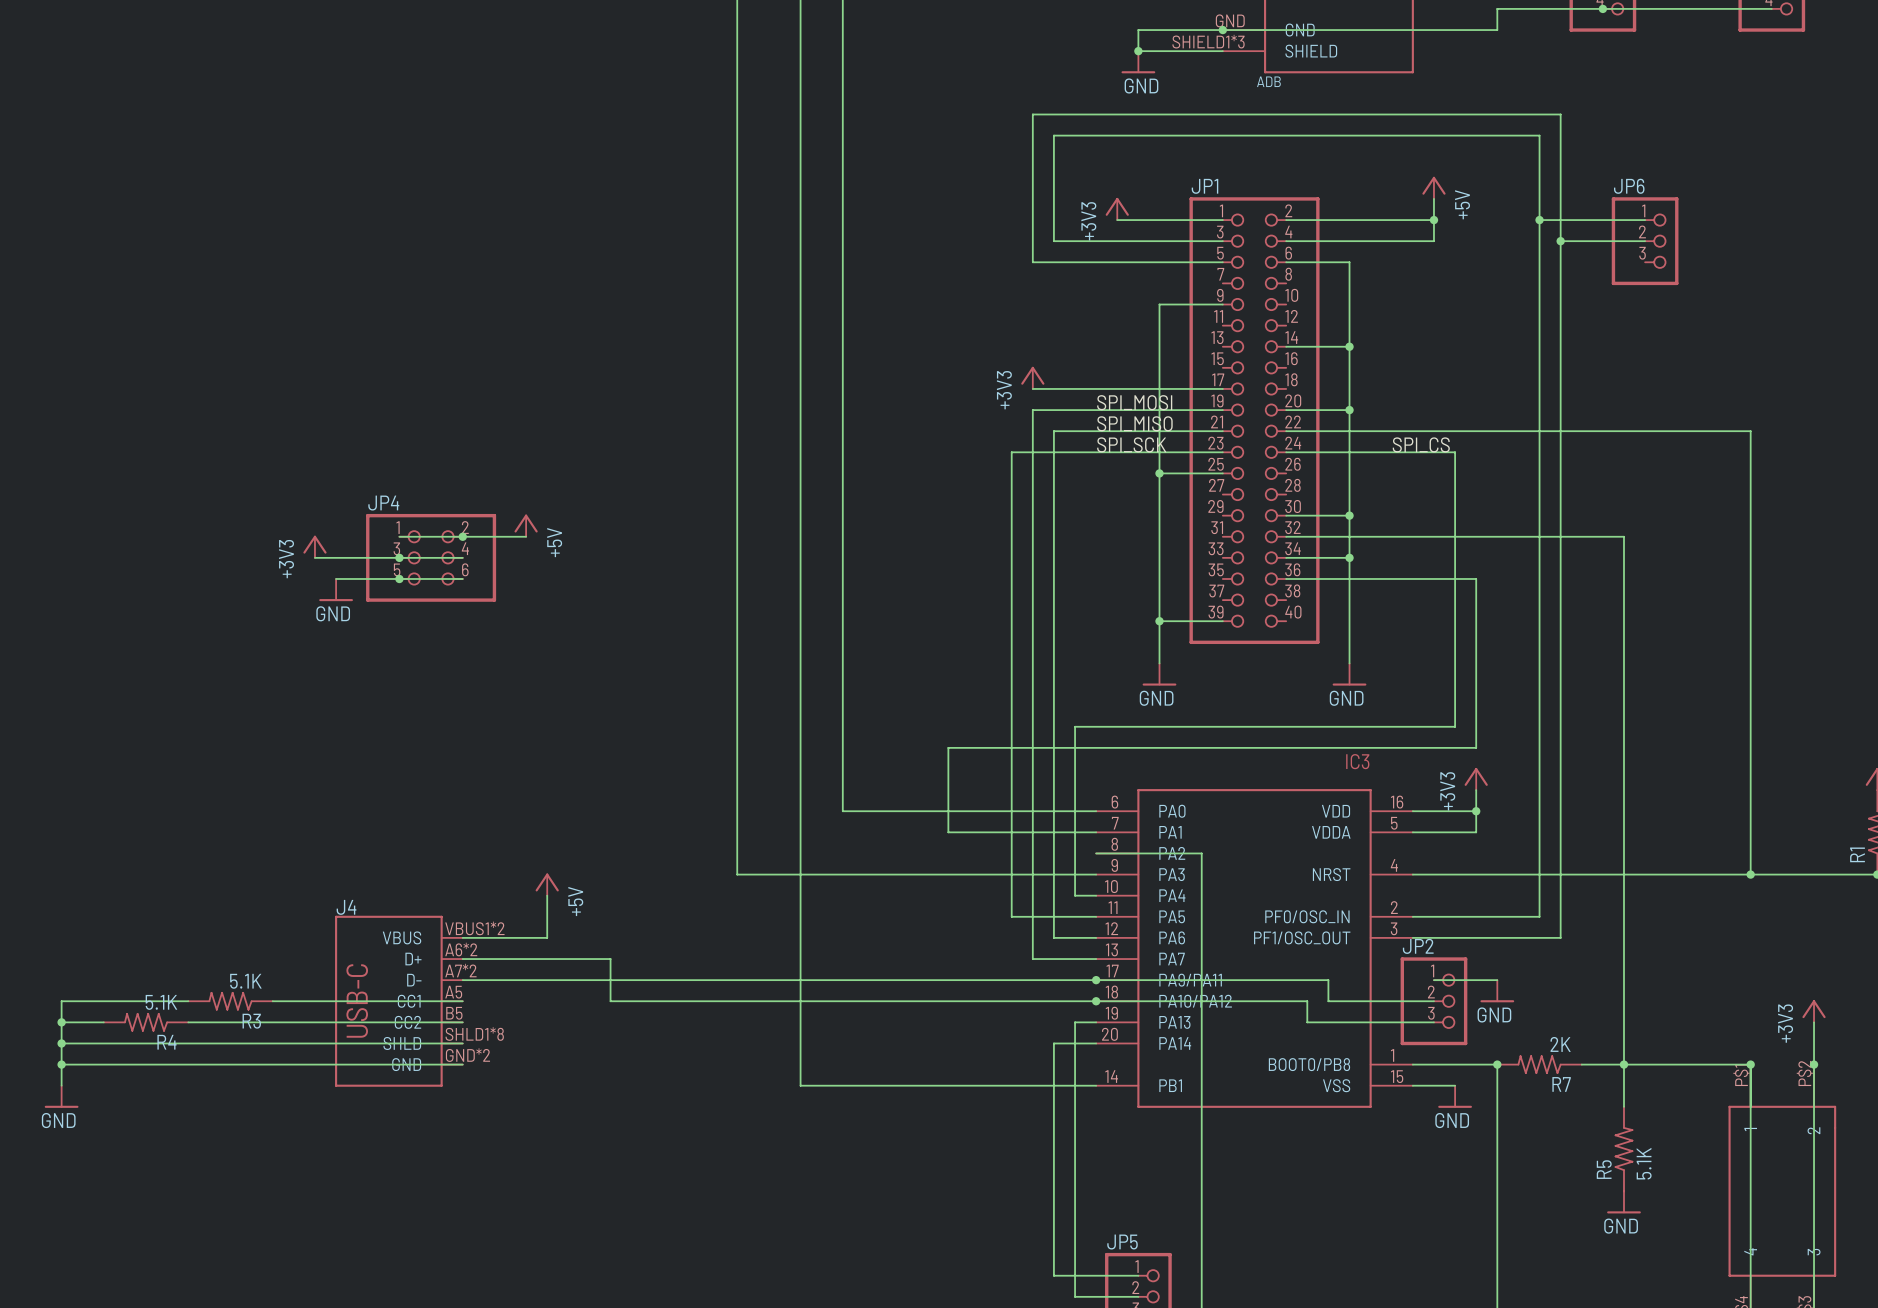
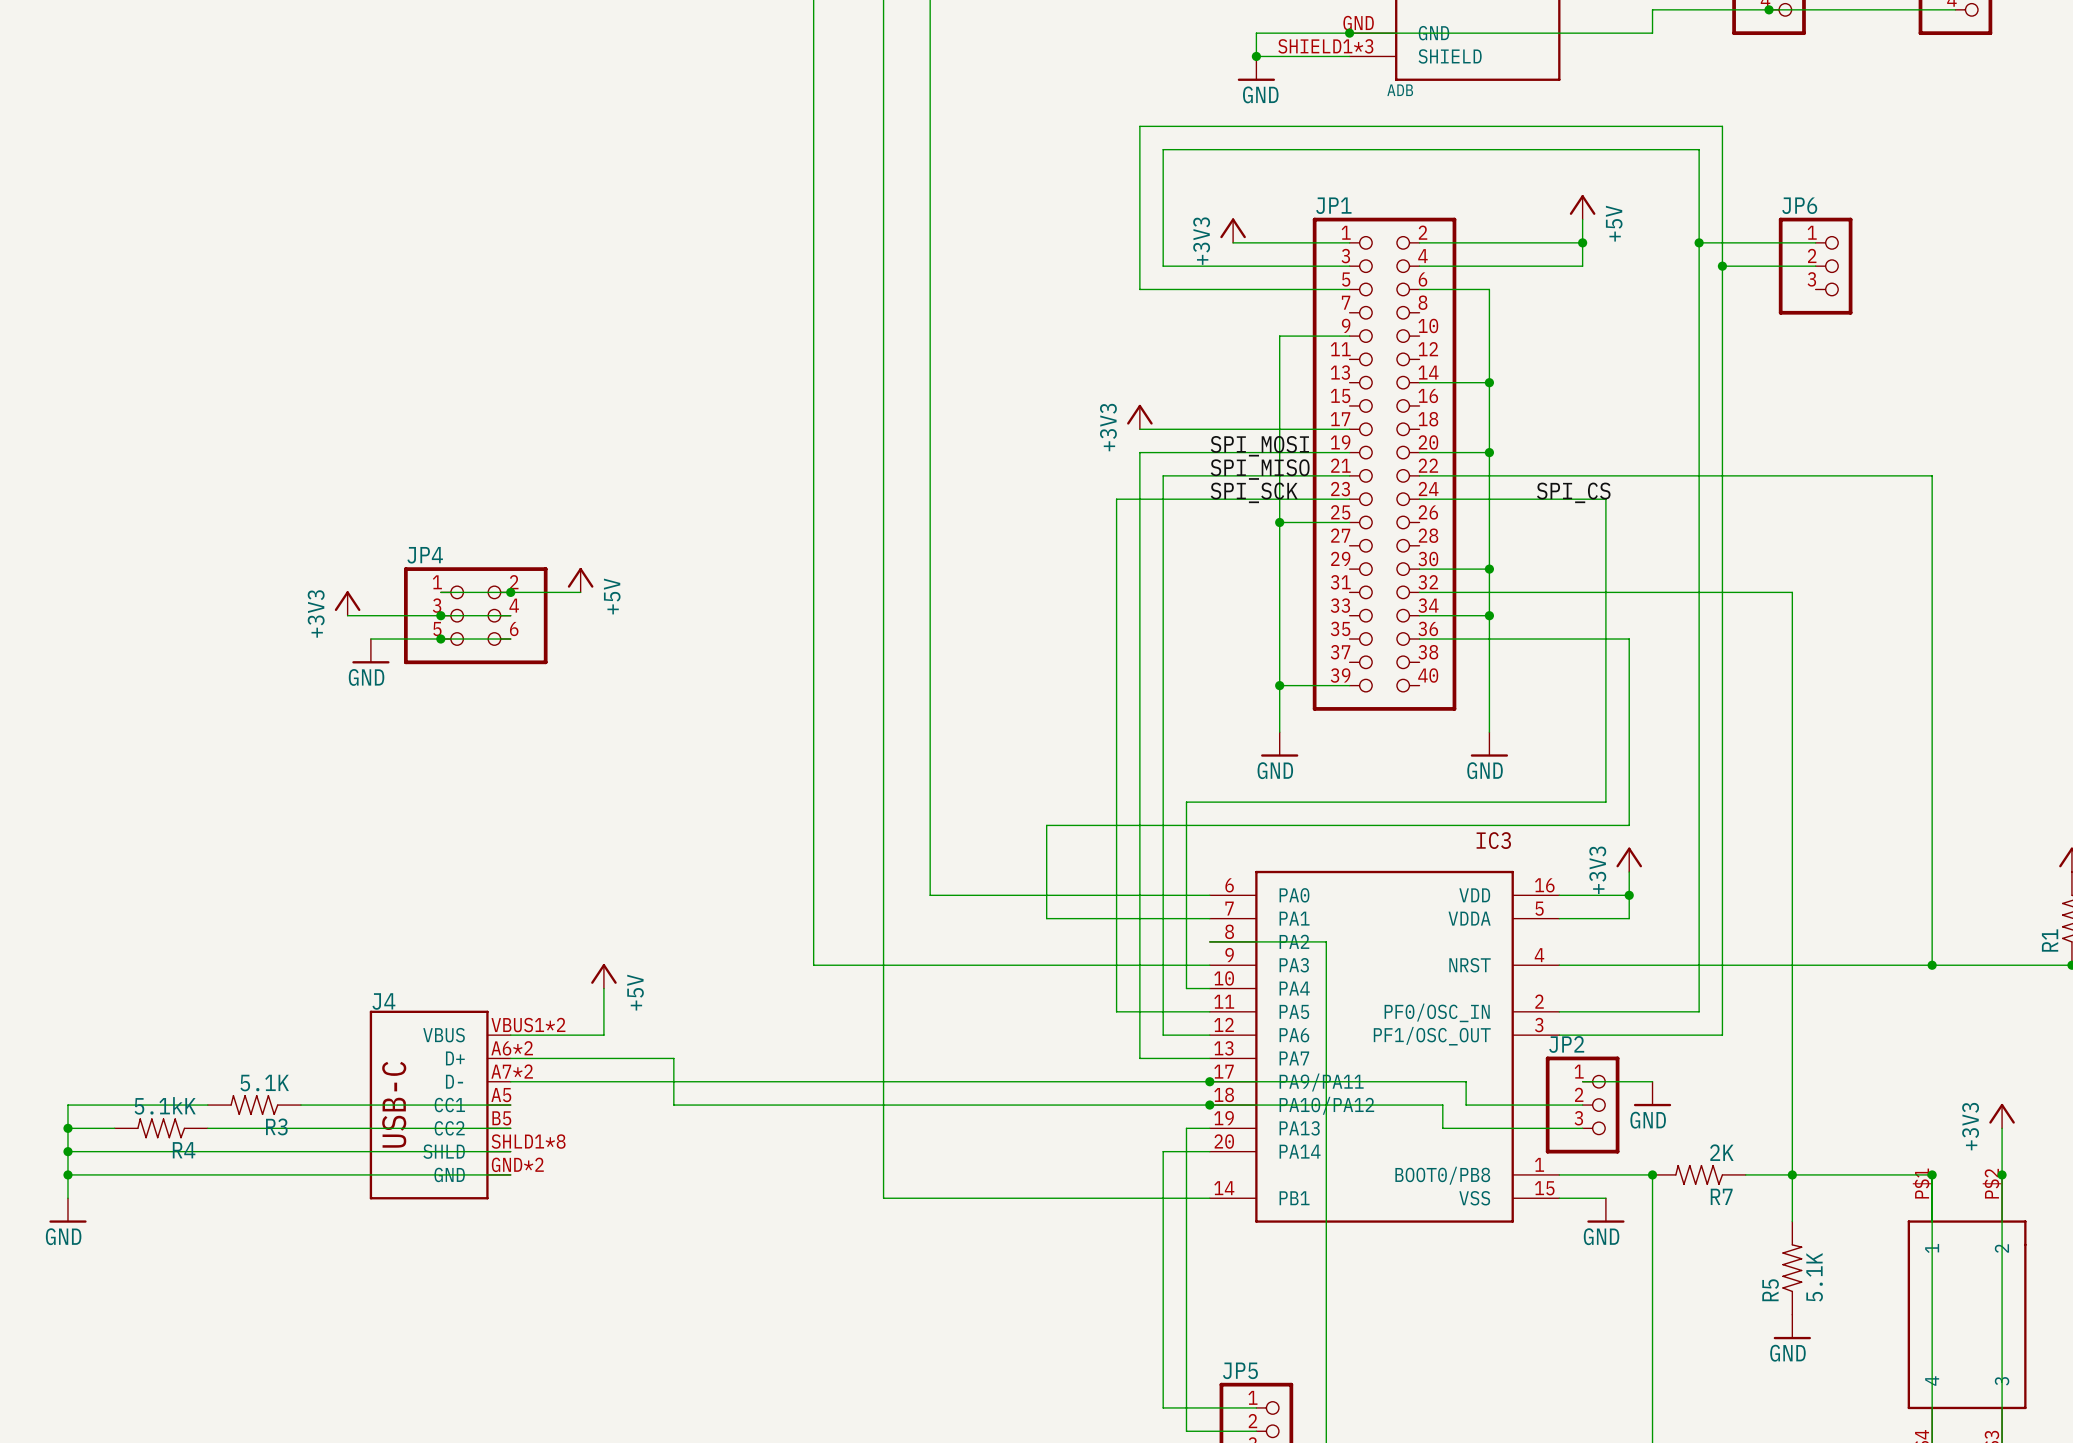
R4 value: 5.1K (161, 1002) -> 5.1kK (165, 1105)

